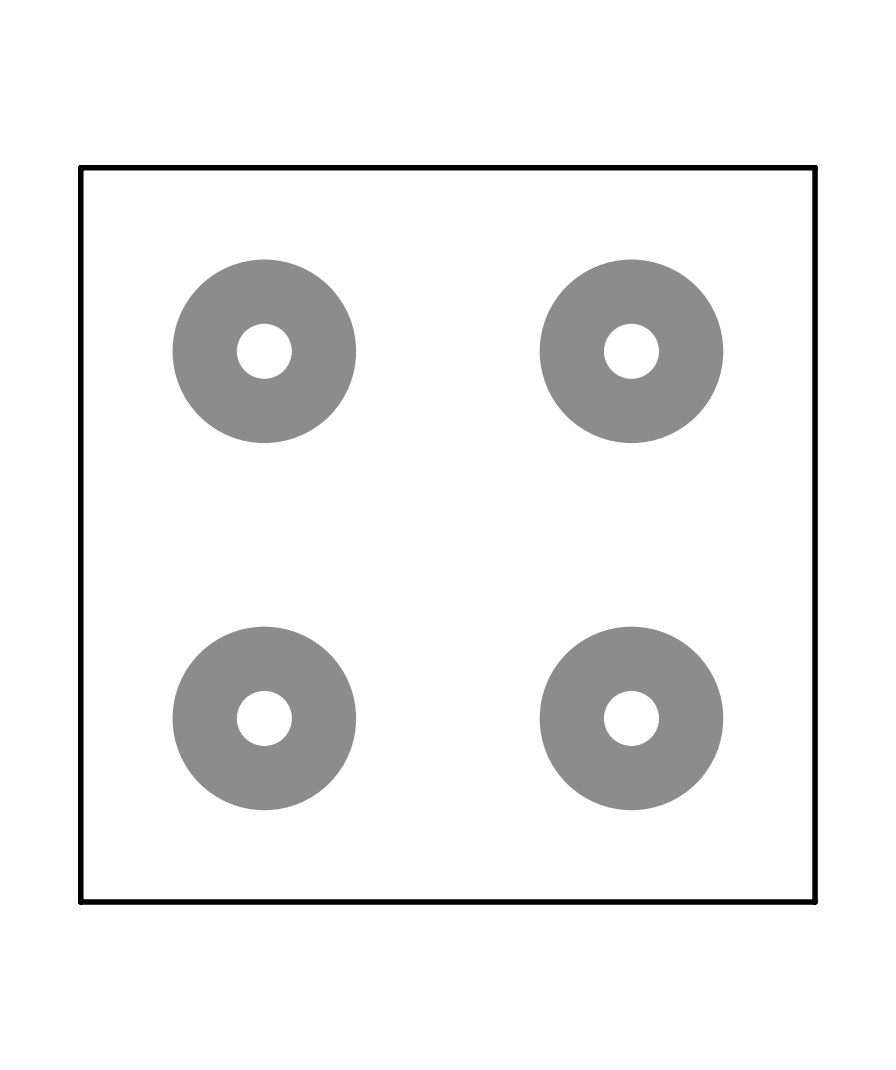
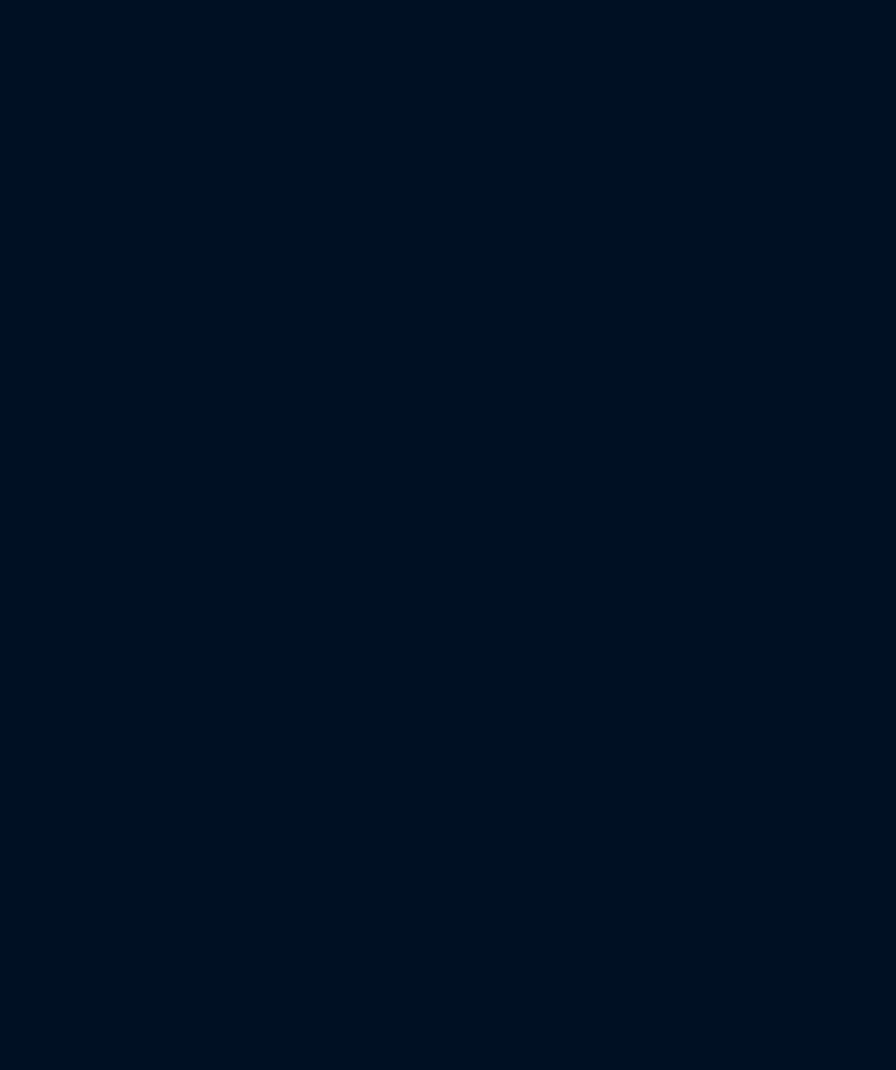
board edge: (815, 167) (815, 902) (80, 902) (80, 167) (815, 167) -> none
part: (264, 351) -> none
part: (631, 351) -> none
part: (264, 718) -> none
part: (631, 718) -> none

